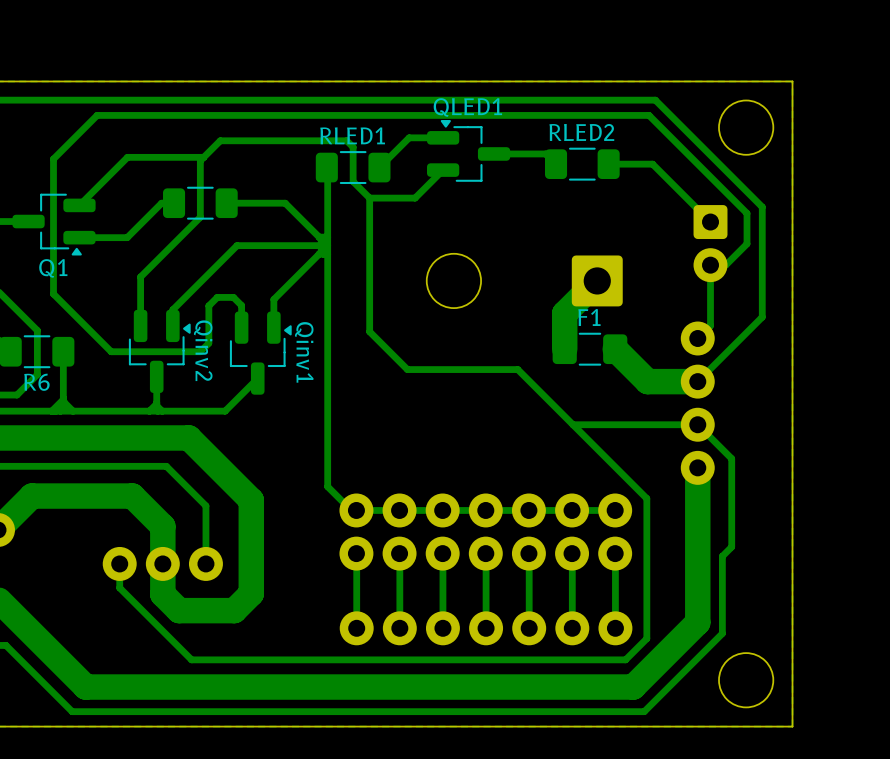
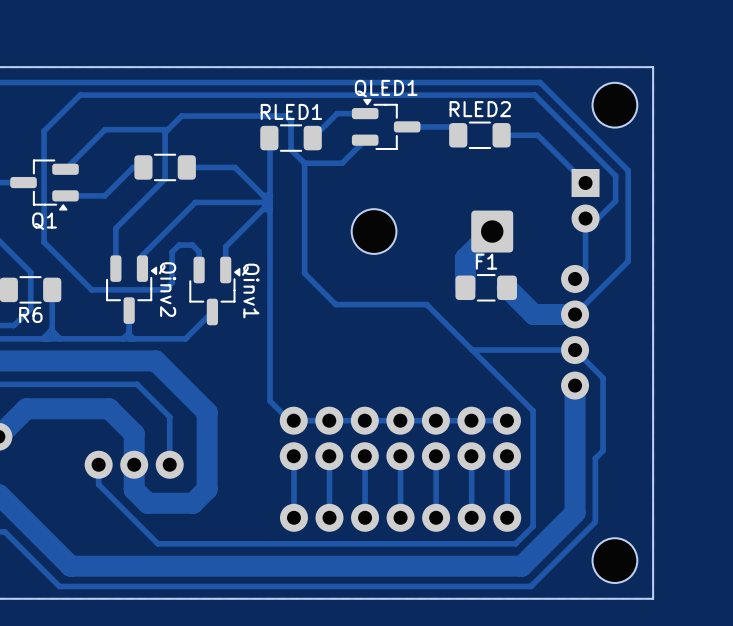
part footprint: [693, 205, 728, 283] -> [571, 168, 600, 233]

